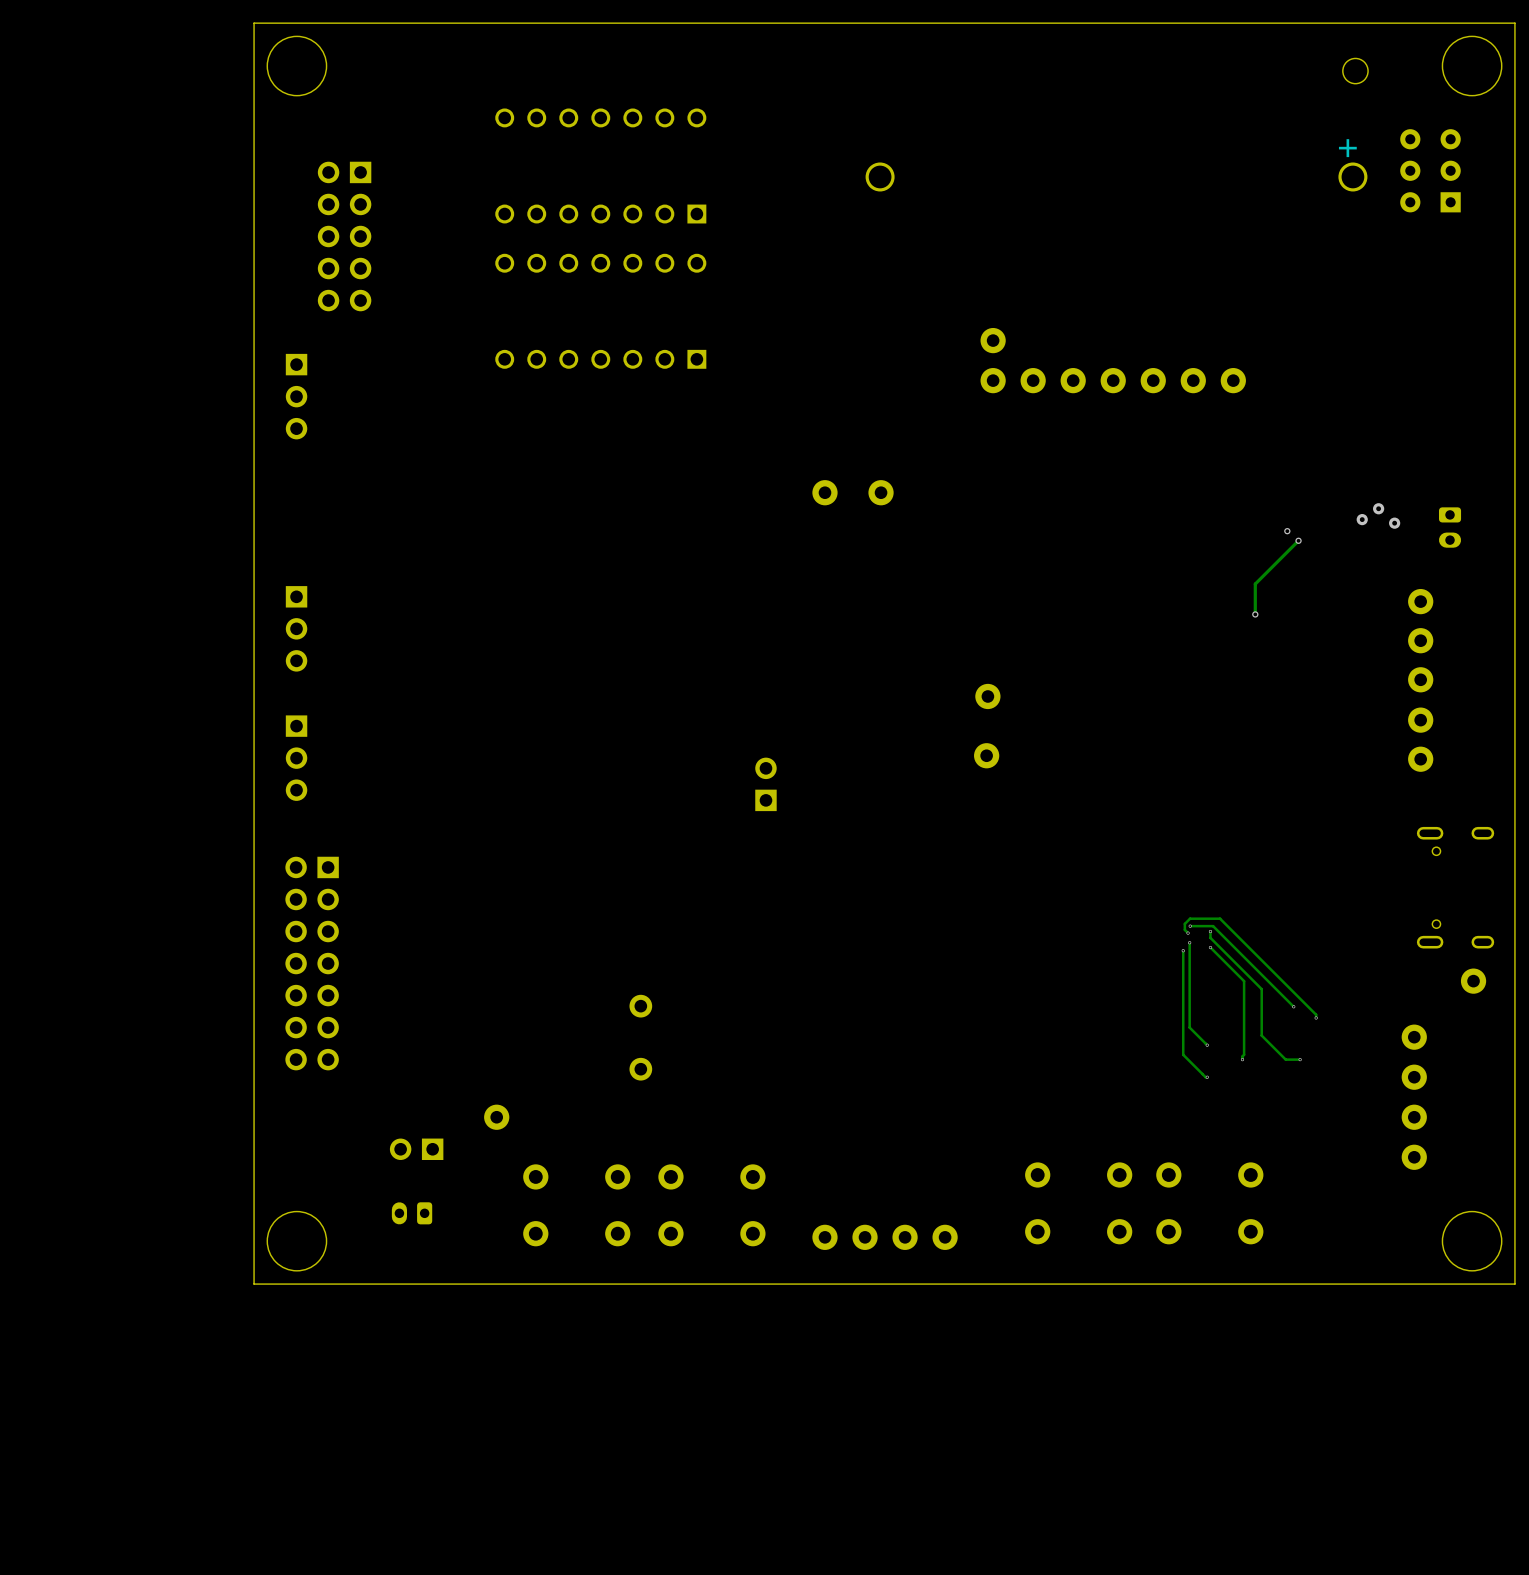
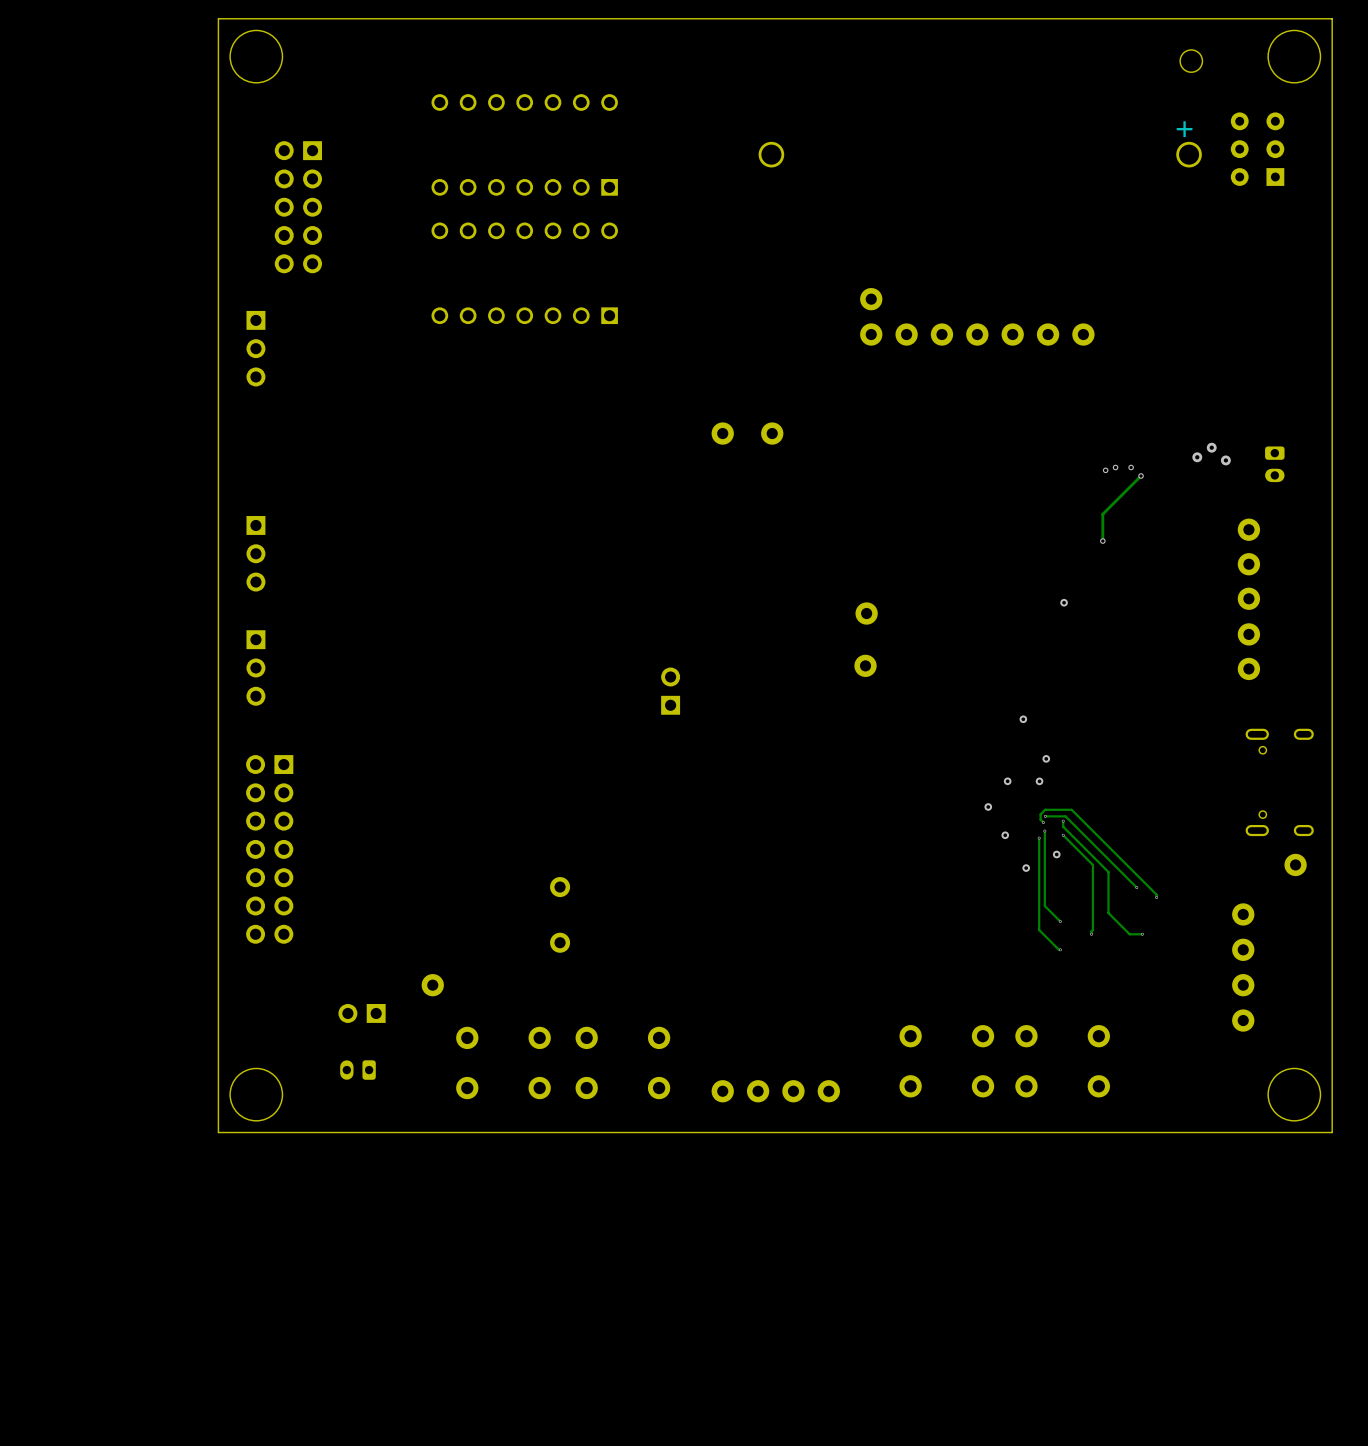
via: none -> (1115, 467)
via: none -> (1105, 470)
via: none -> (1064, 602)
via: none -> (1023, 719)
via: none -> (1046, 758)
via: none -> (1007, 781)
via: none -> (1039, 781)
via: none -> (988, 806)
via: none -> (1005, 835)
via: none -> (1056, 854)
via: none -> (1026, 868)

